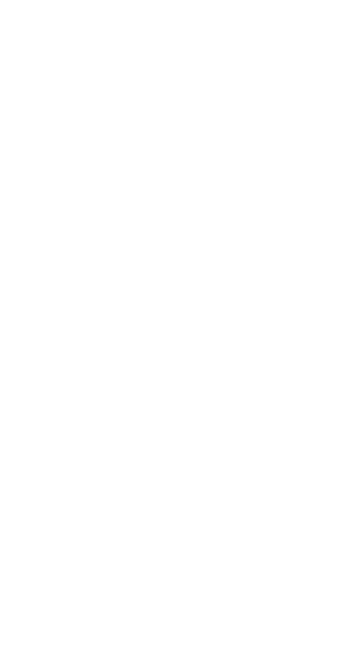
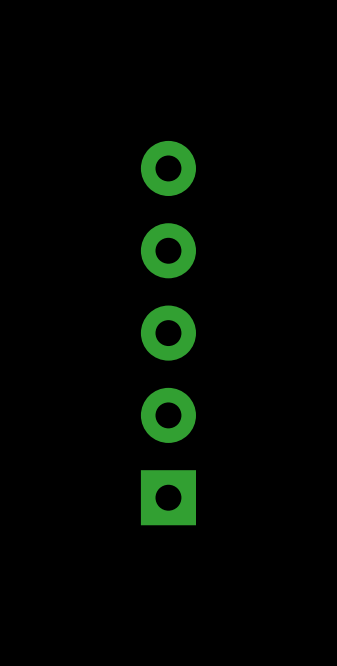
part: none -> (168, 333)

